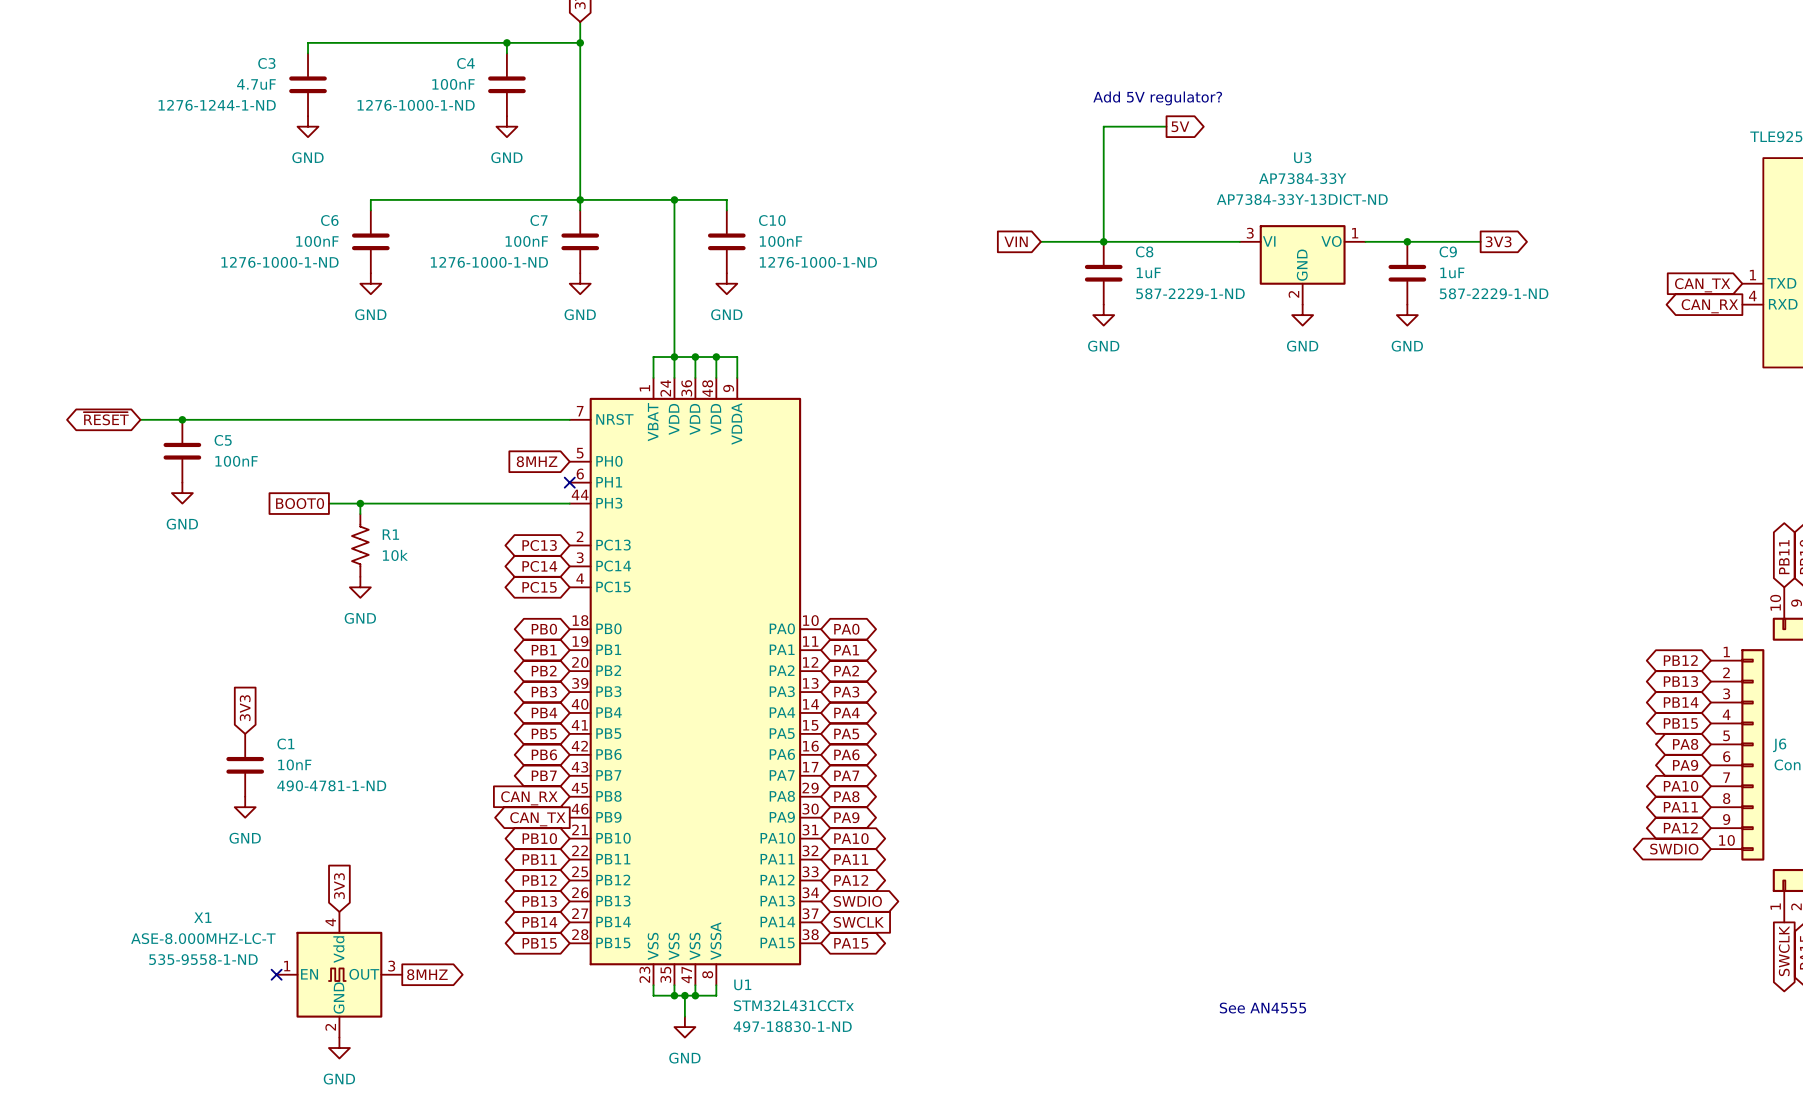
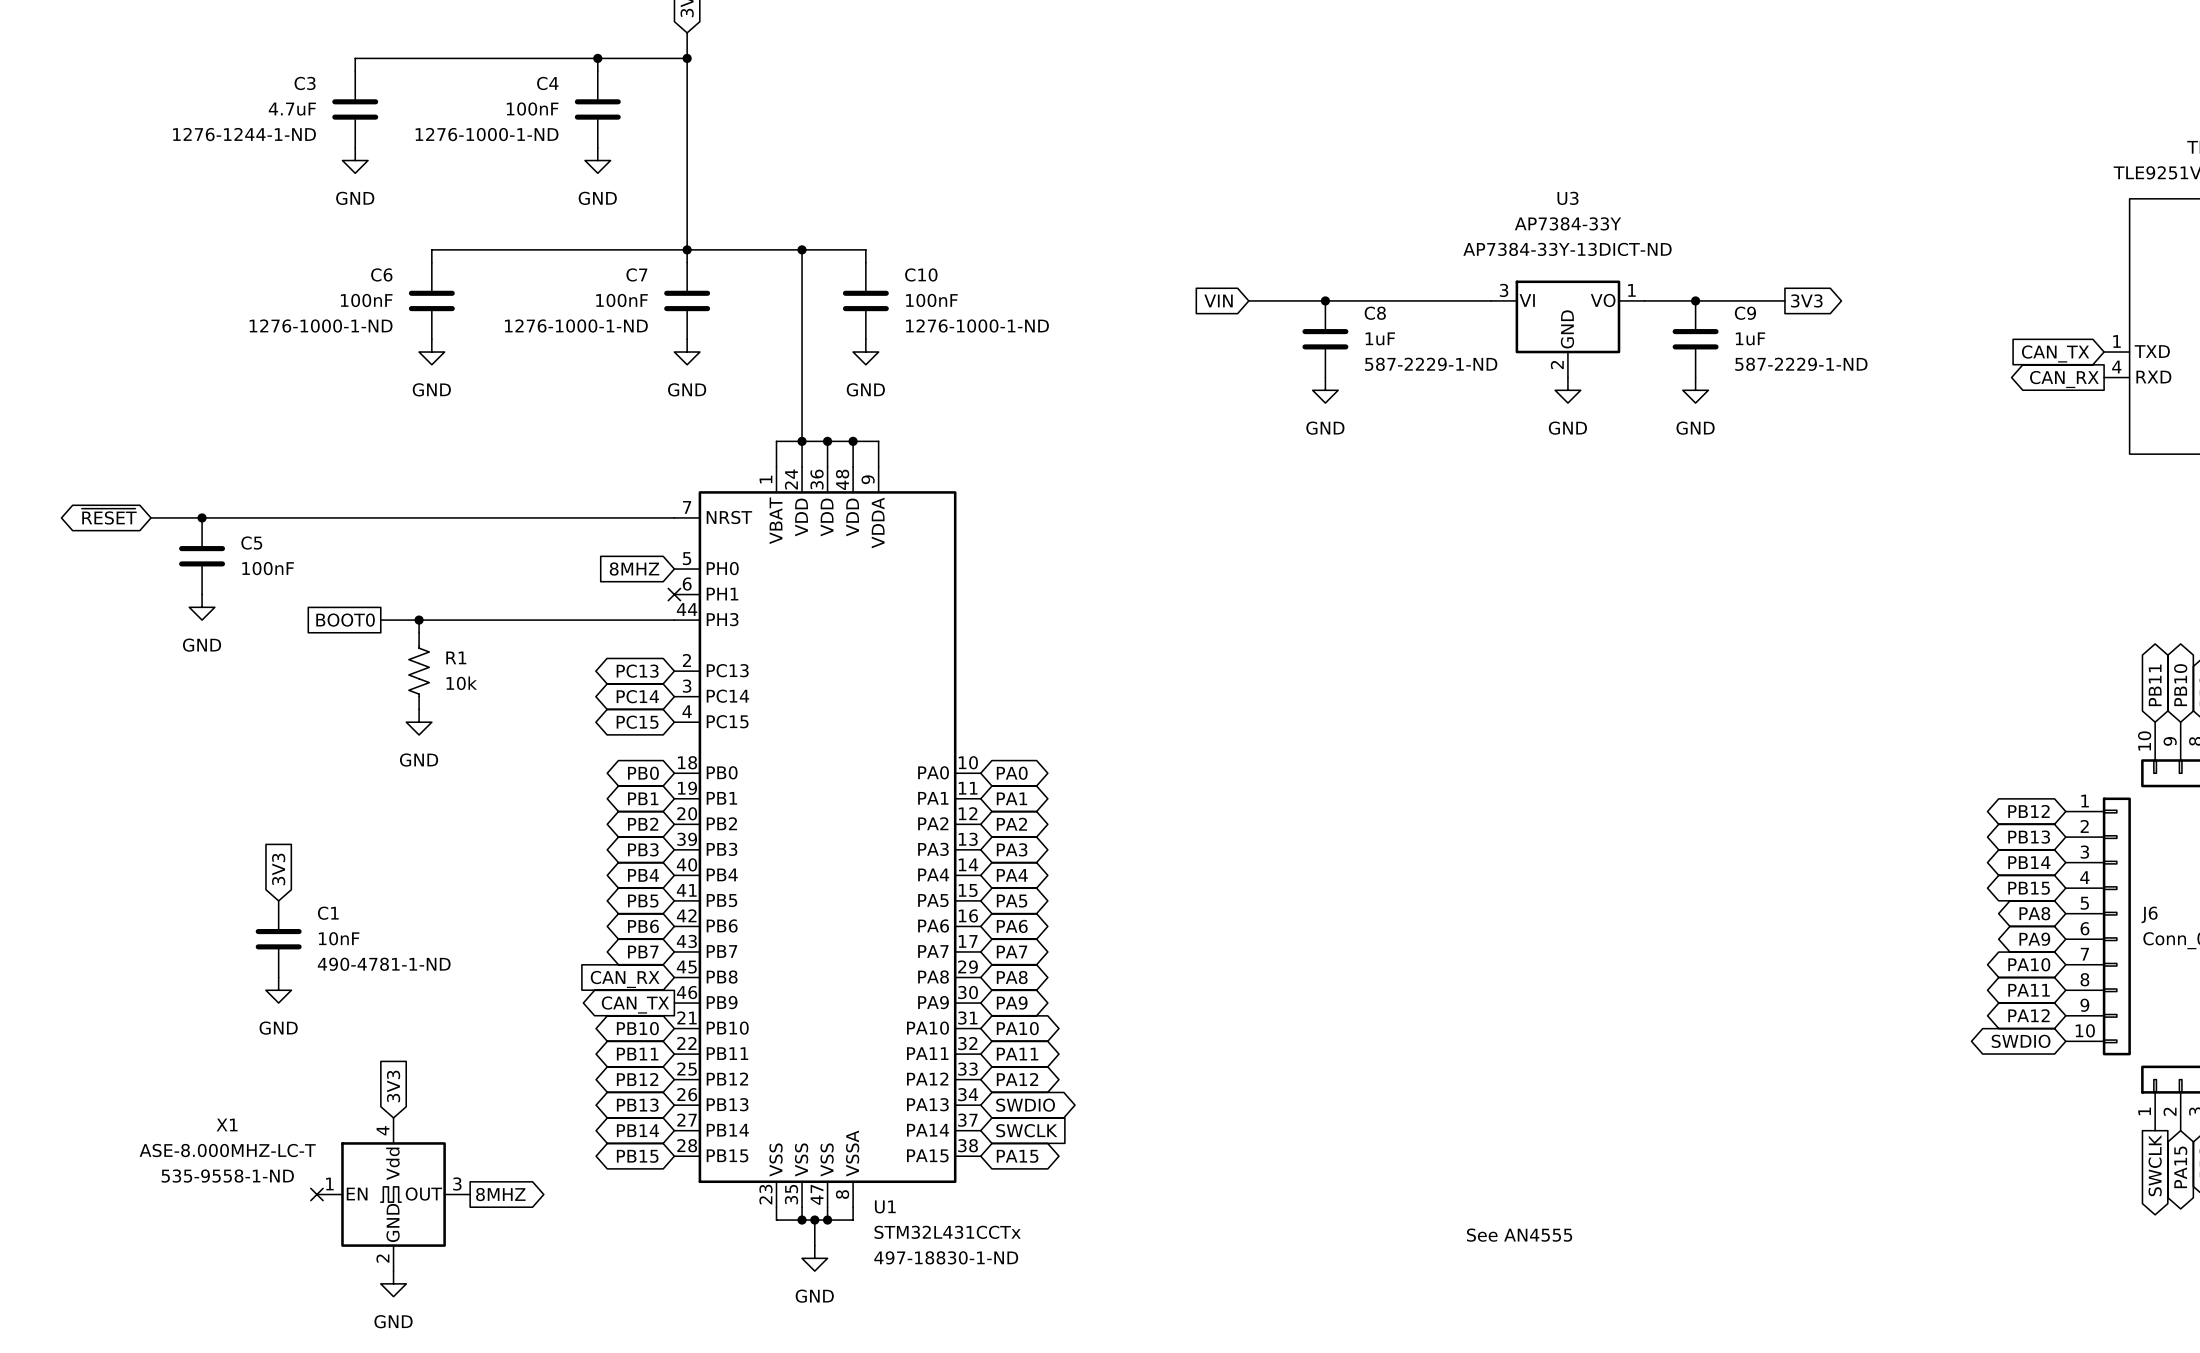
text: Add 5V regulator? (1157, 98) -> none
wire: (1166, 126) (1103, 126) (1103, 241) -> none
global label: 5V (1180, 126) -> none

